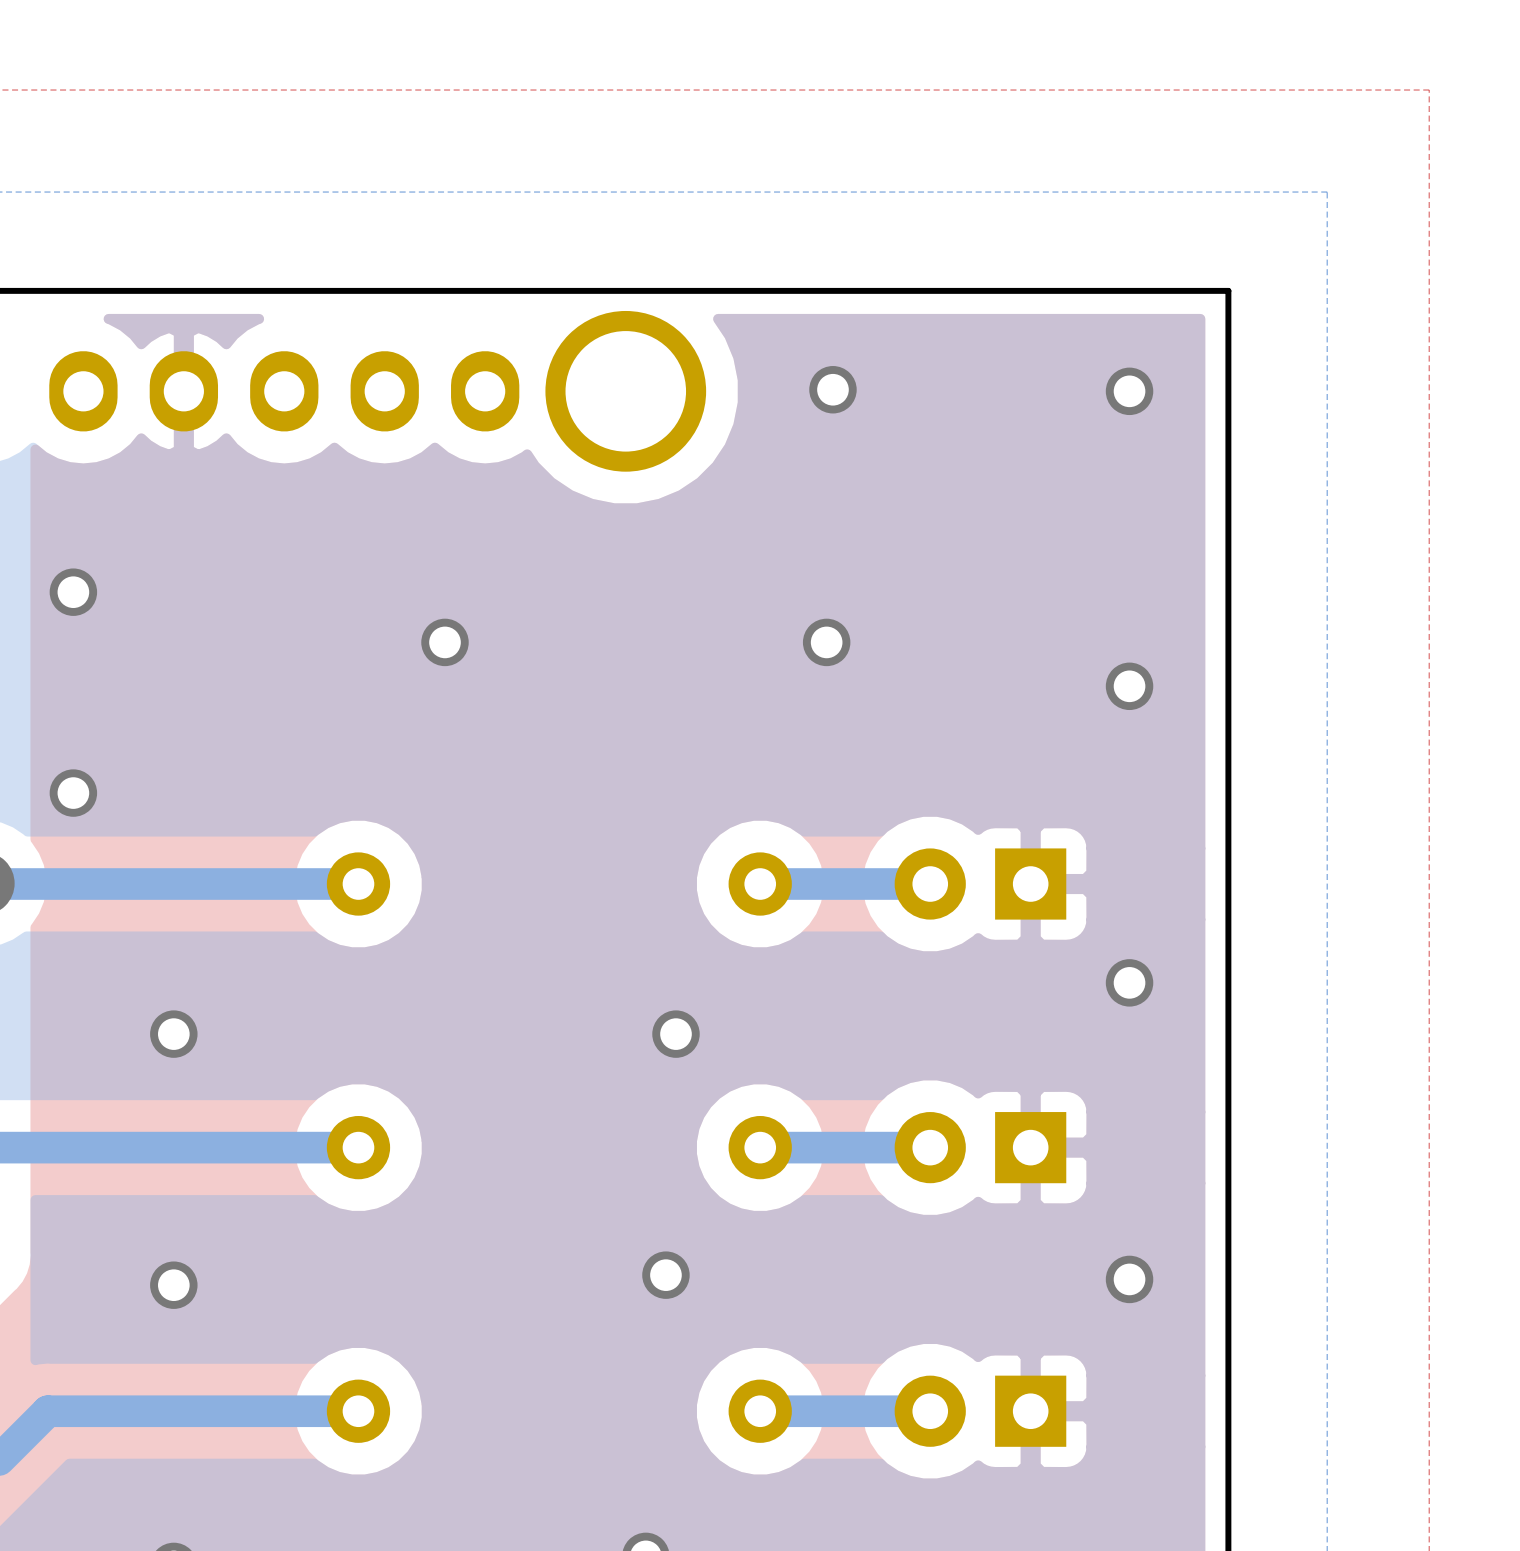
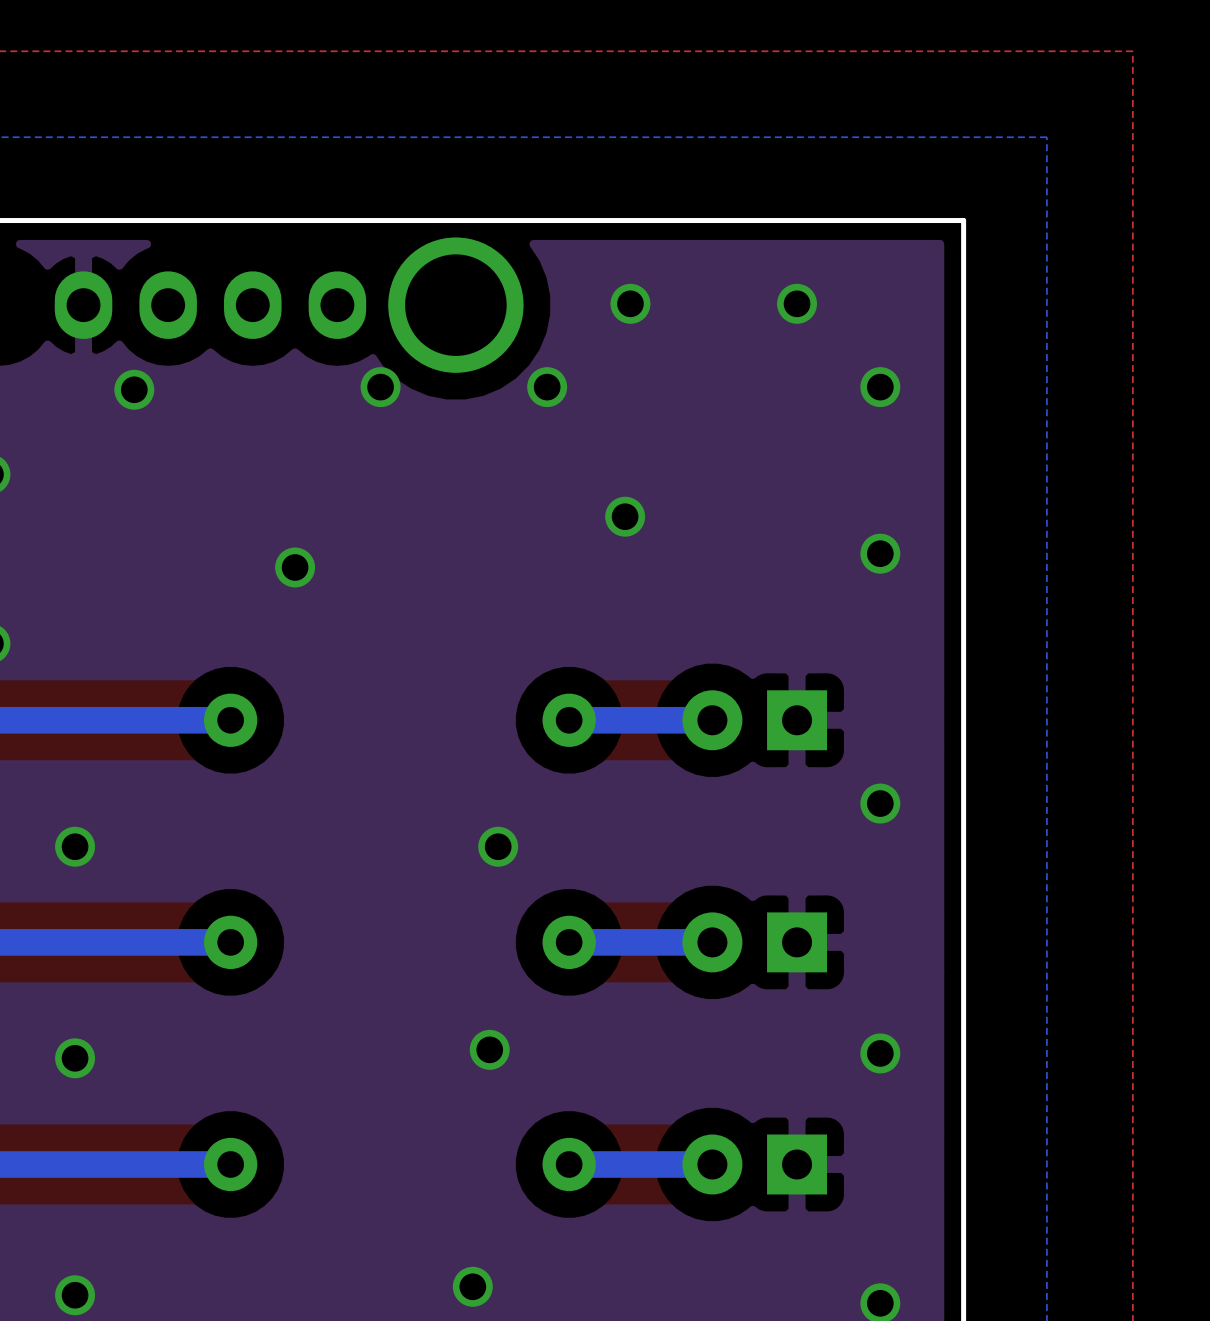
via: none -> (797, 303)
via: (1129, 391) -> none
via: none -> (380, 387)
via: none -> (547, 387)
via: none -> (880, 387)
via: none -> (134, 389)
via position: (444, 642) -> (295, 567)

